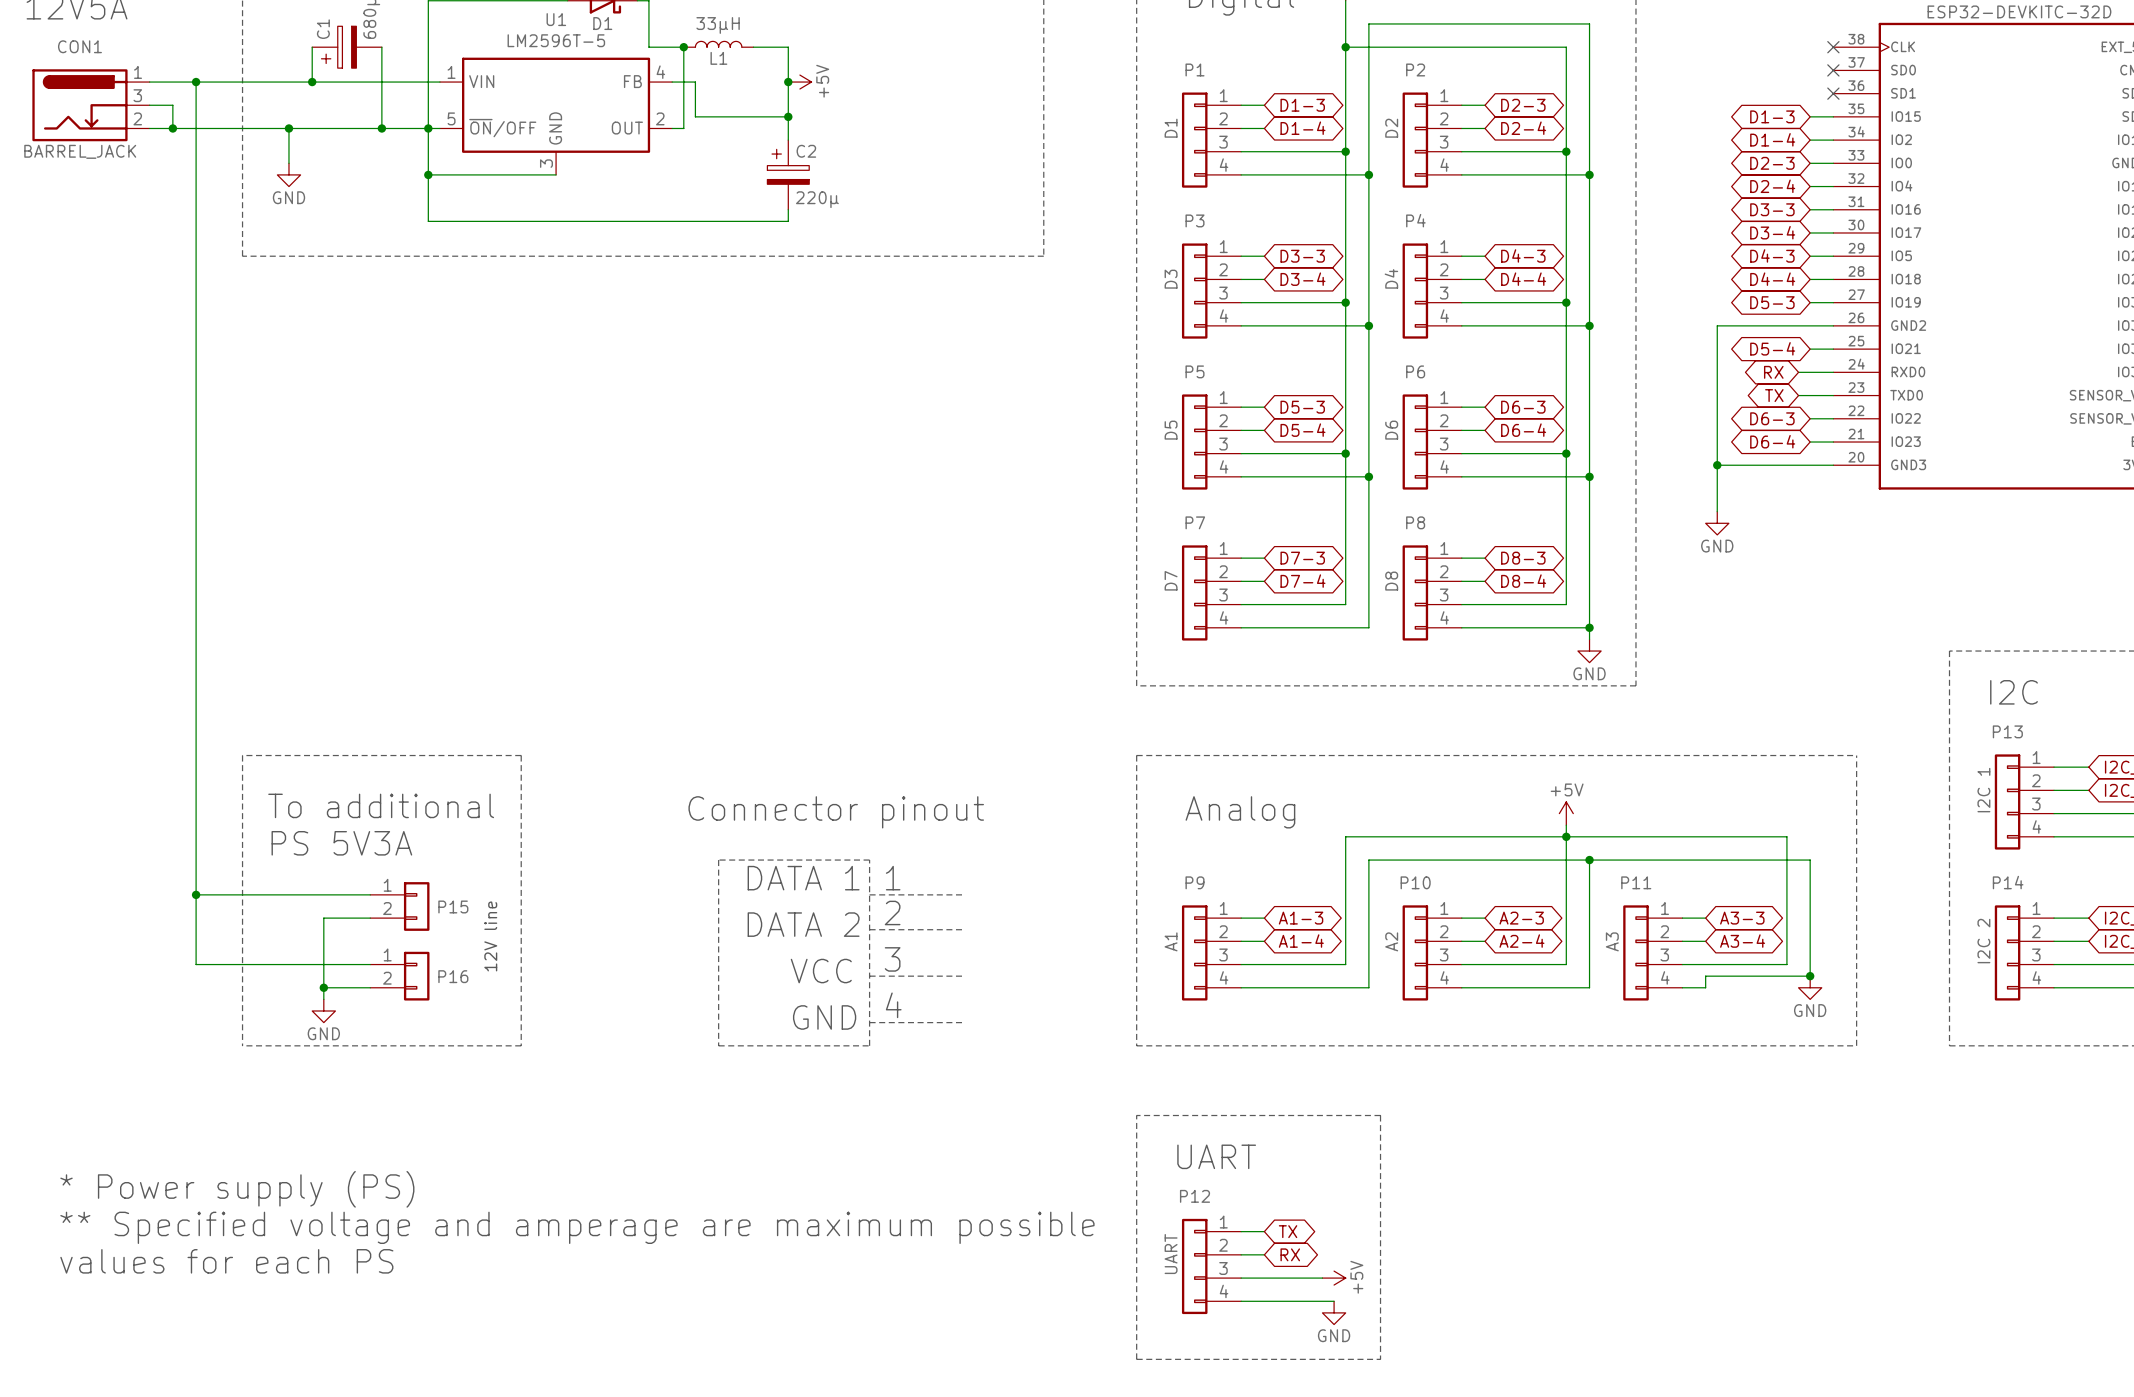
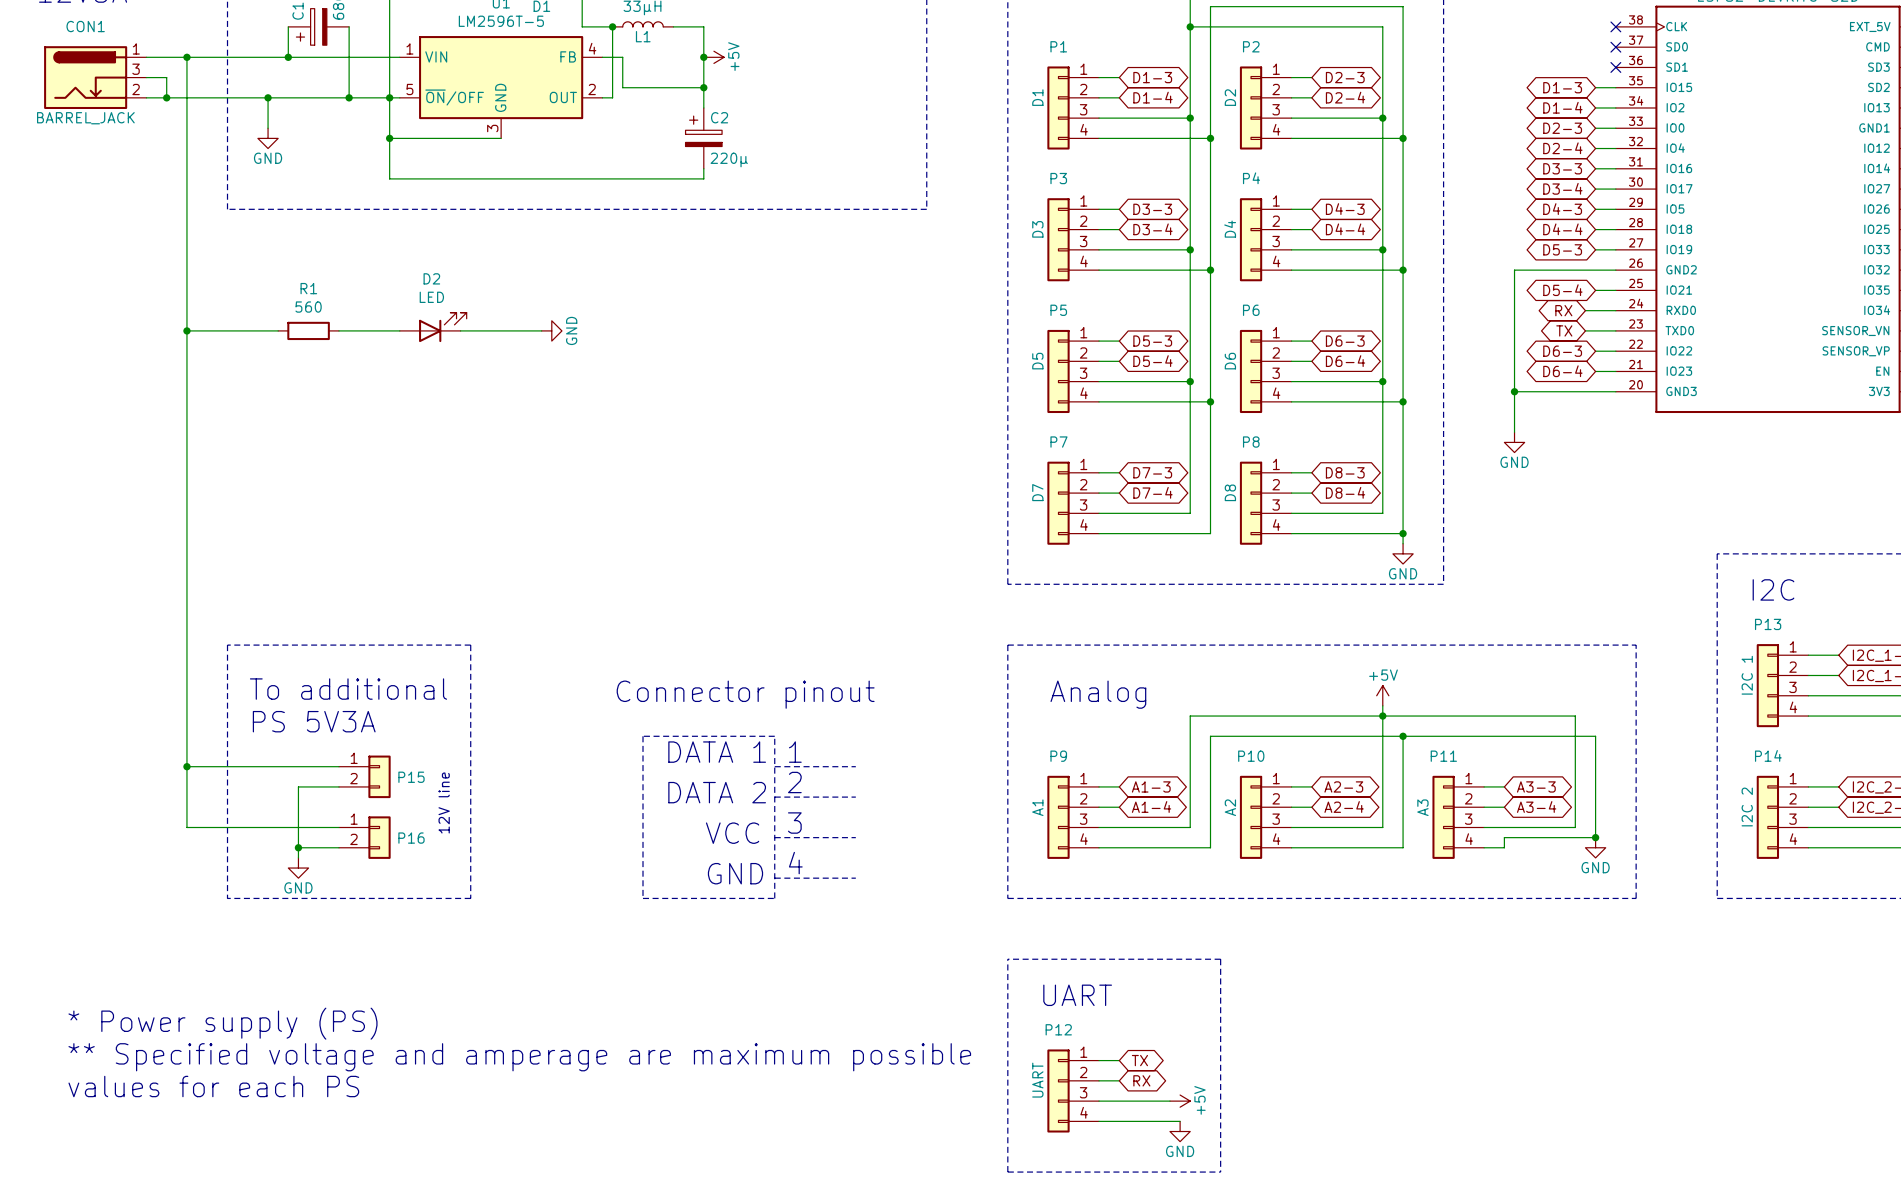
D2: none -> LED (433, 327)
wire: none -> (186, 330) (278, 330)
junction: none -> (186, 330)
R1: none -> 560 (308, 330)
wire: none -> (338, 330) (399, 330)
wire: none -> (460, 330) (541, 330)
power symbol: none -> GND (551, 330)

